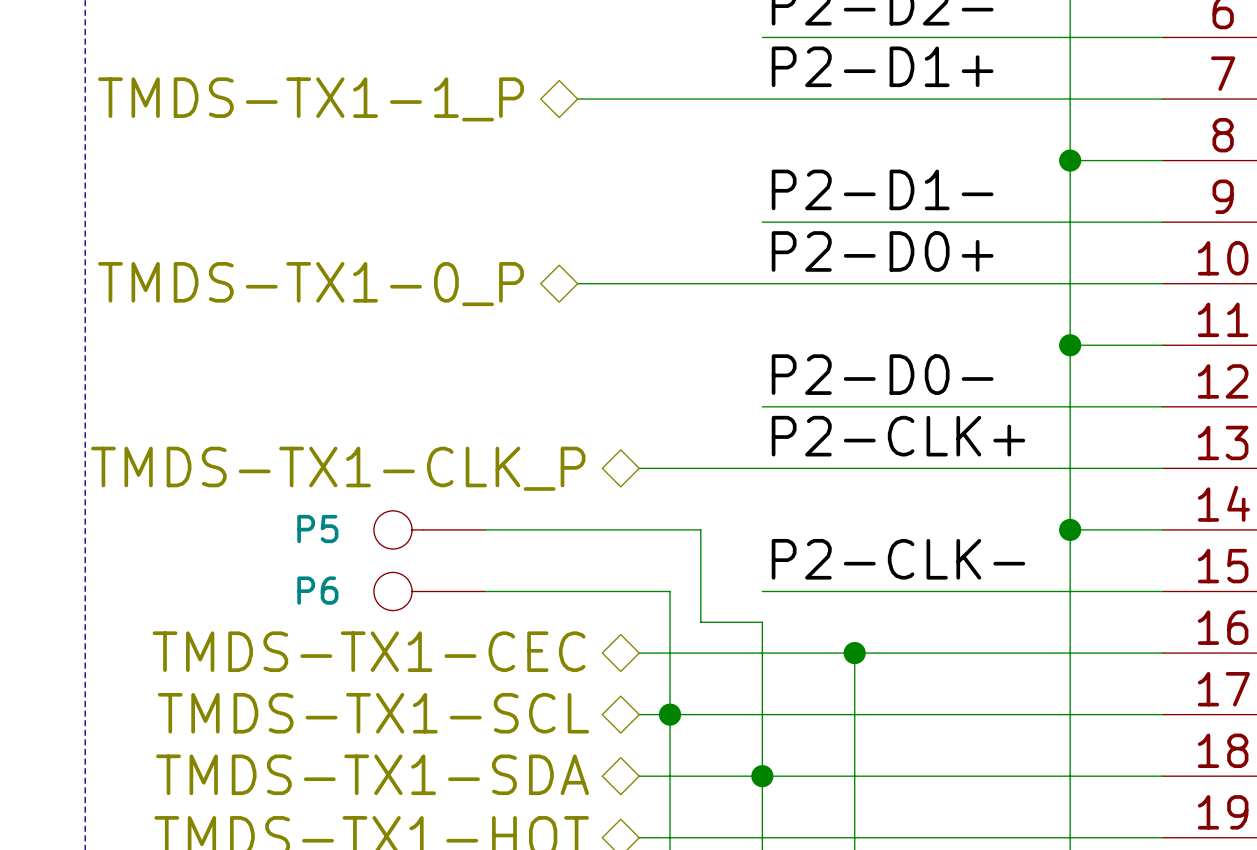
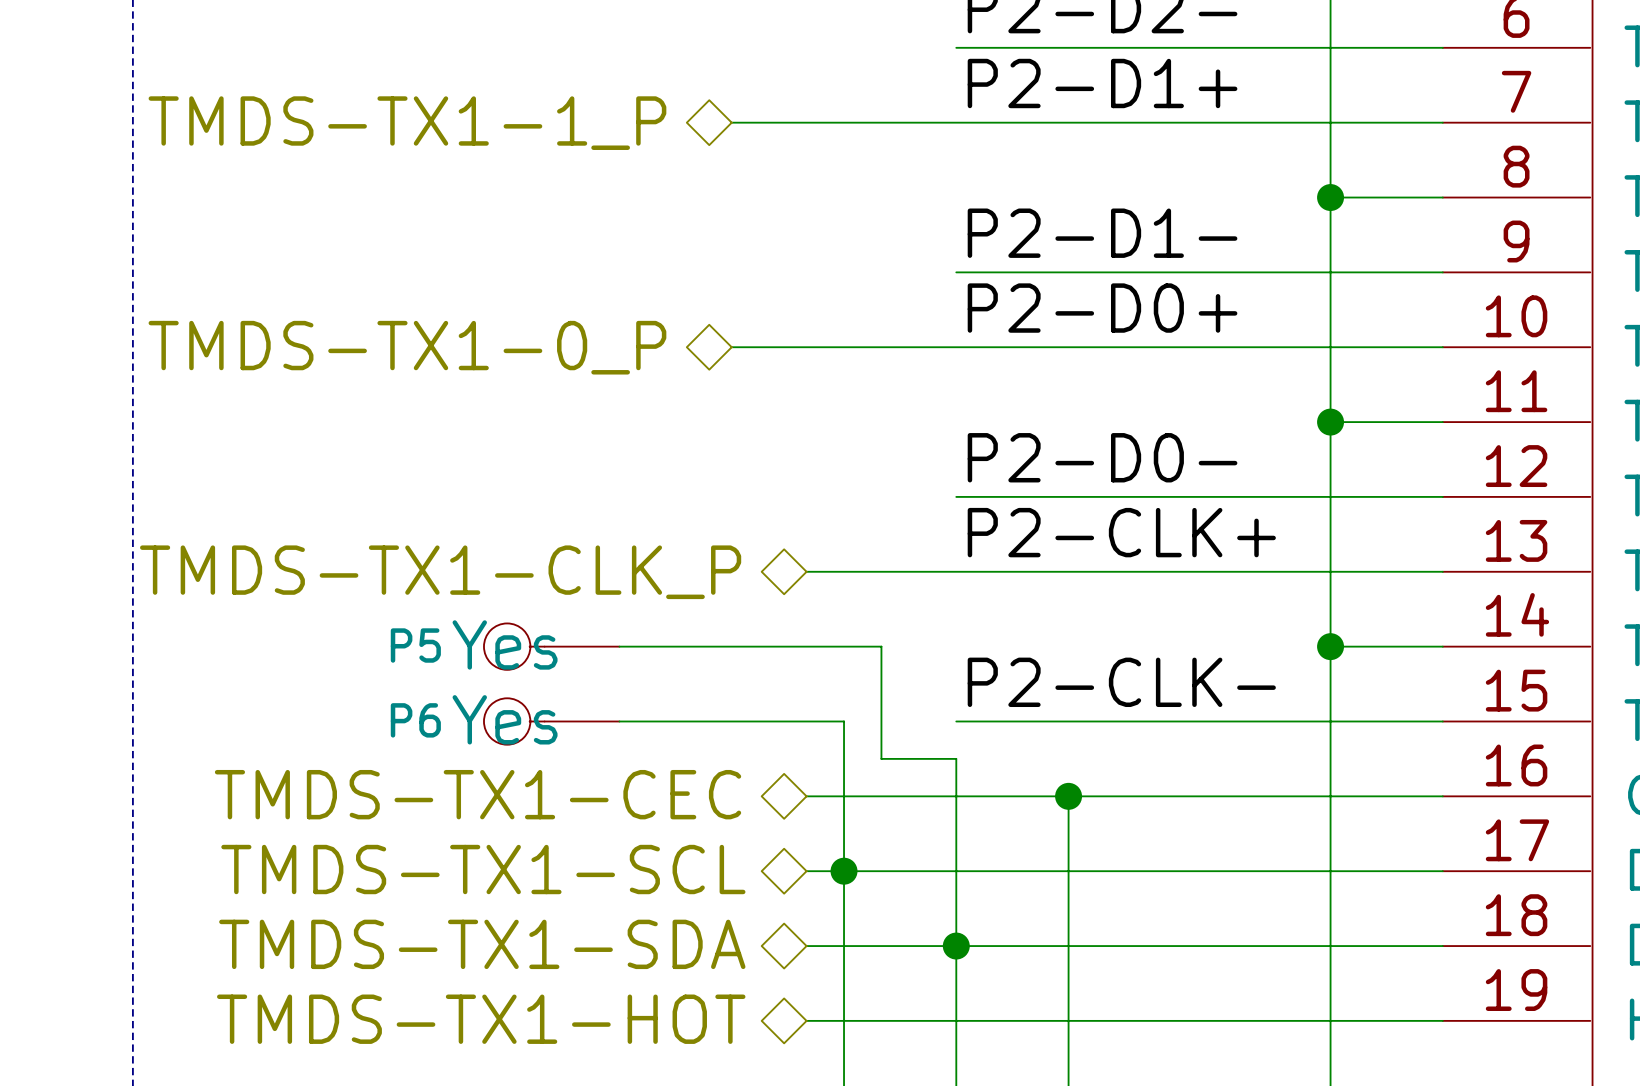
P5 text: none -> Yes (505, 644)
P6 text: none -> Yes (505, 719)

